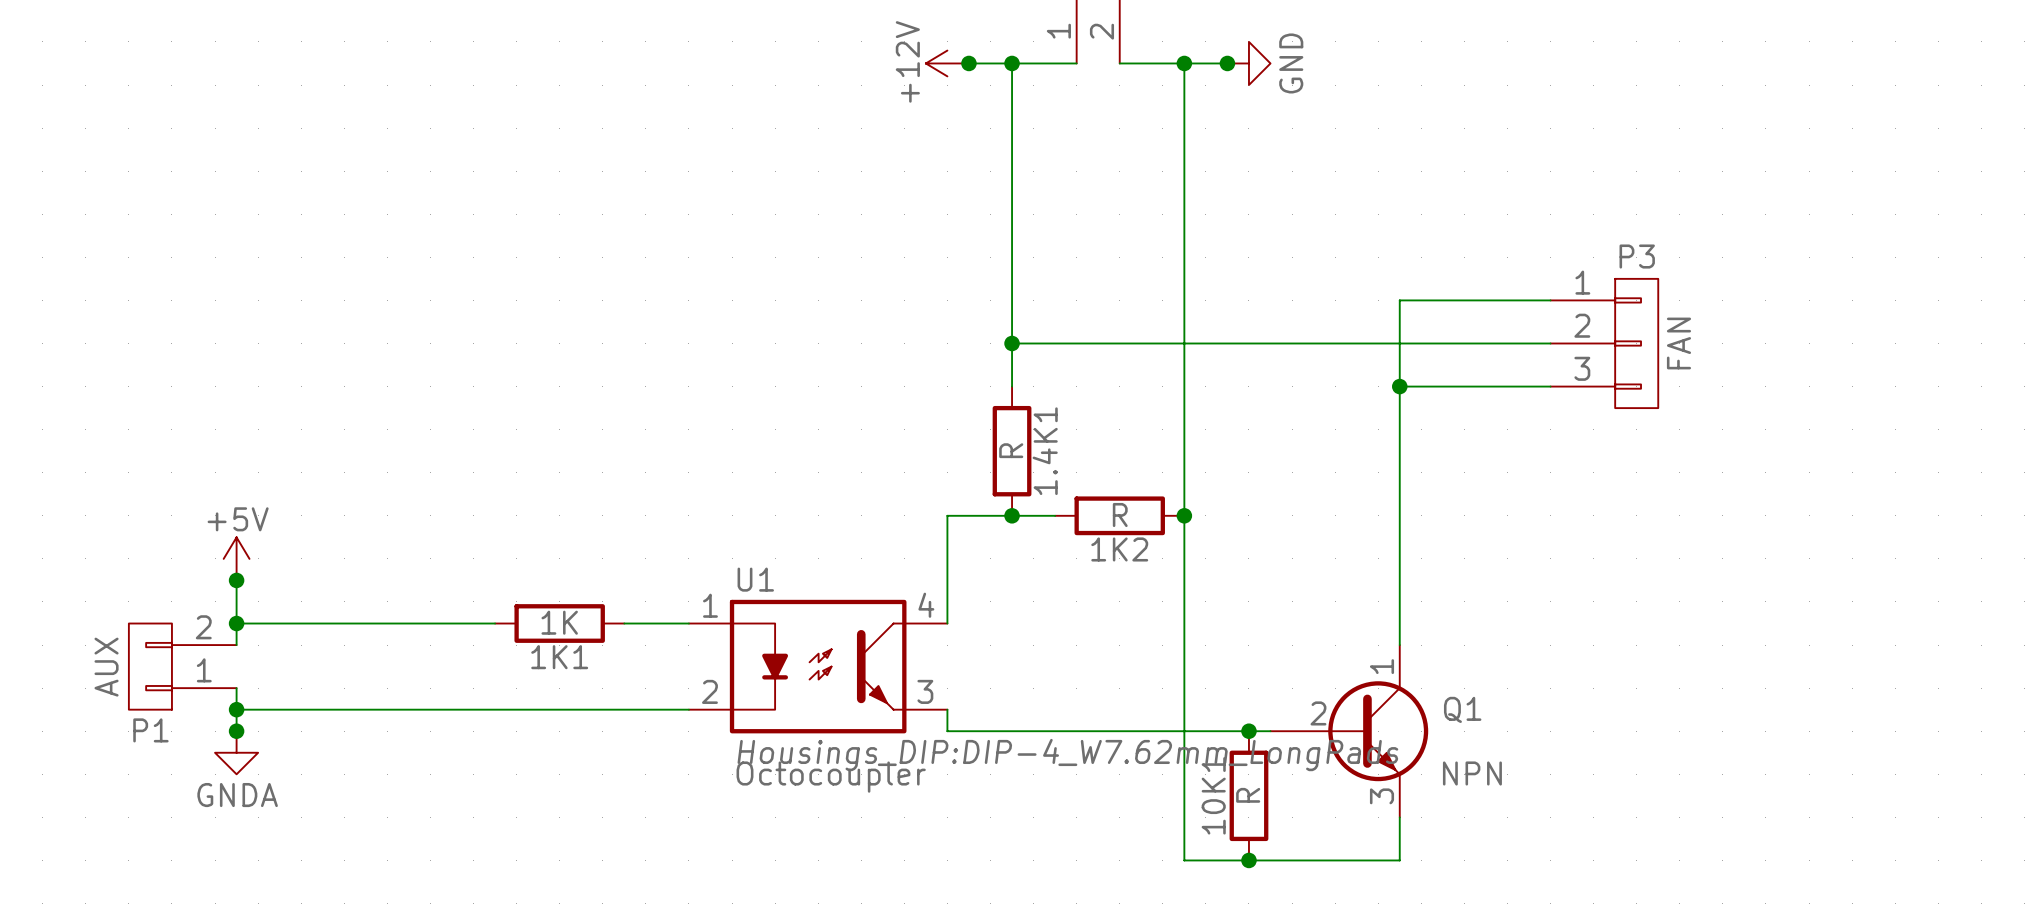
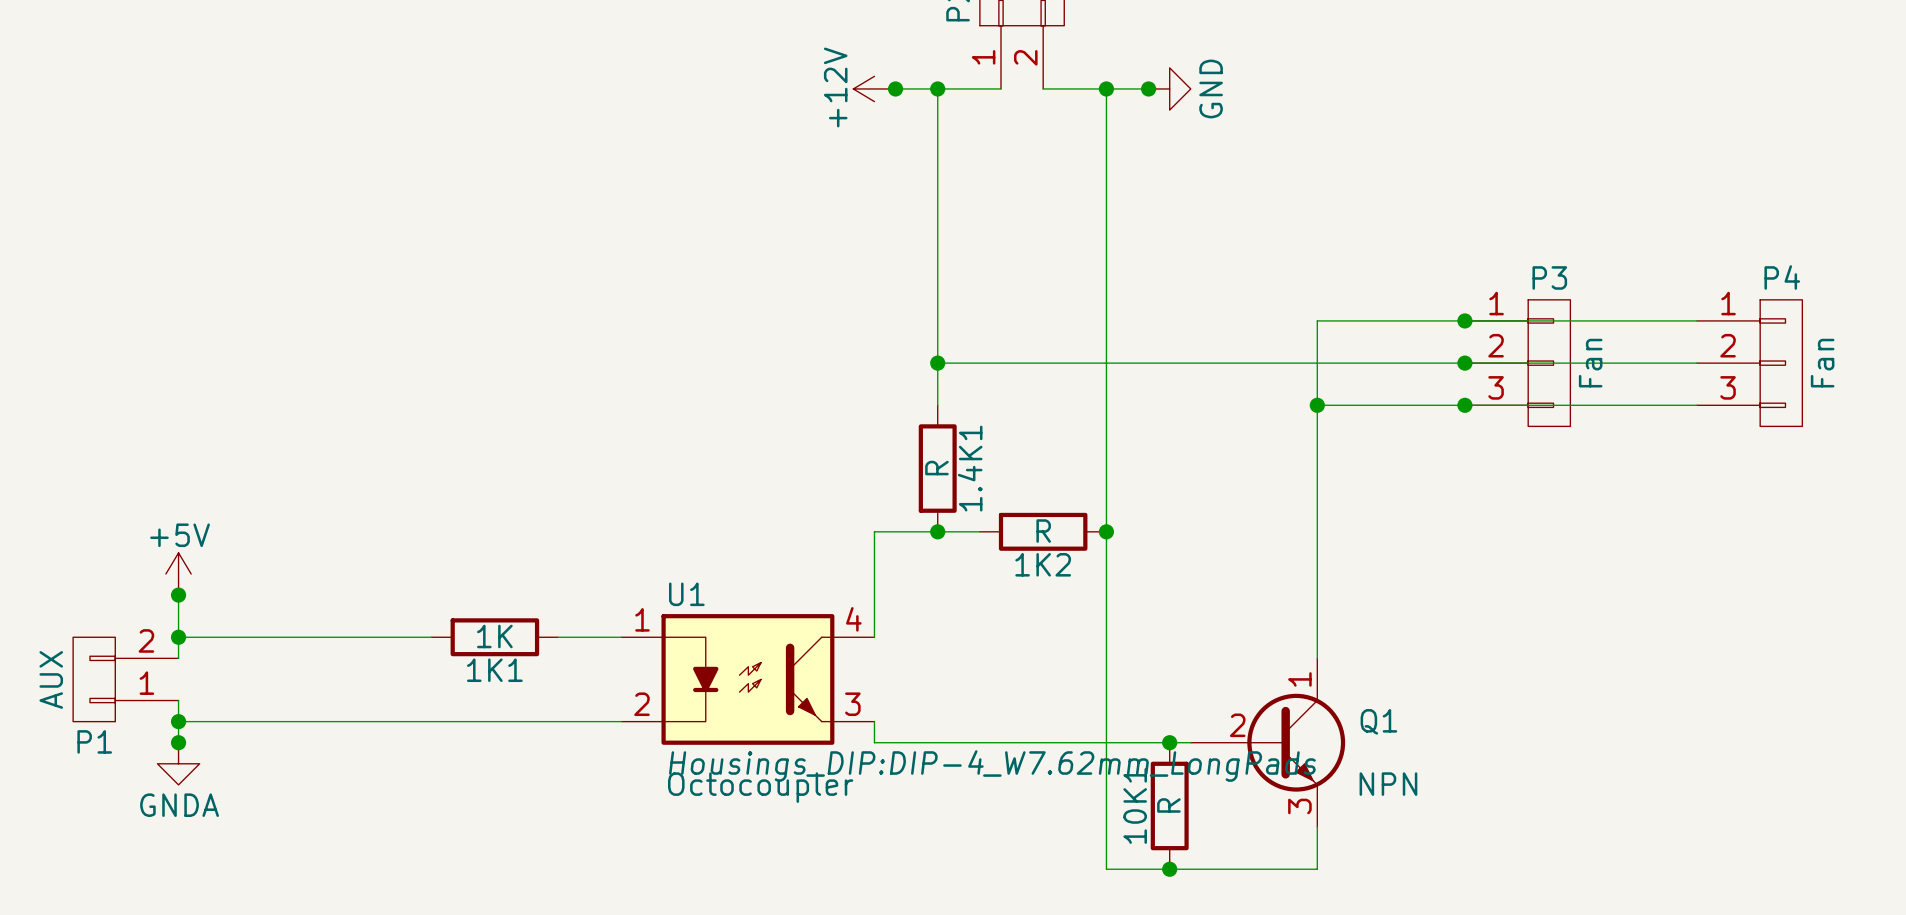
wire: none -> (1464, 320) (1696, 320)
junction: none -> (1464, 320)
wire: none -> (1464, 363) (1696, 363)
junction: none -> (1464, 363)
P3 value: FAN (1678, 343) -> Fan (1590, 363)
P4: none -> Fan (1749, 363)
wire: none -> (1464, 405) (1696, 405)
junction: none -> (1464, 405)

